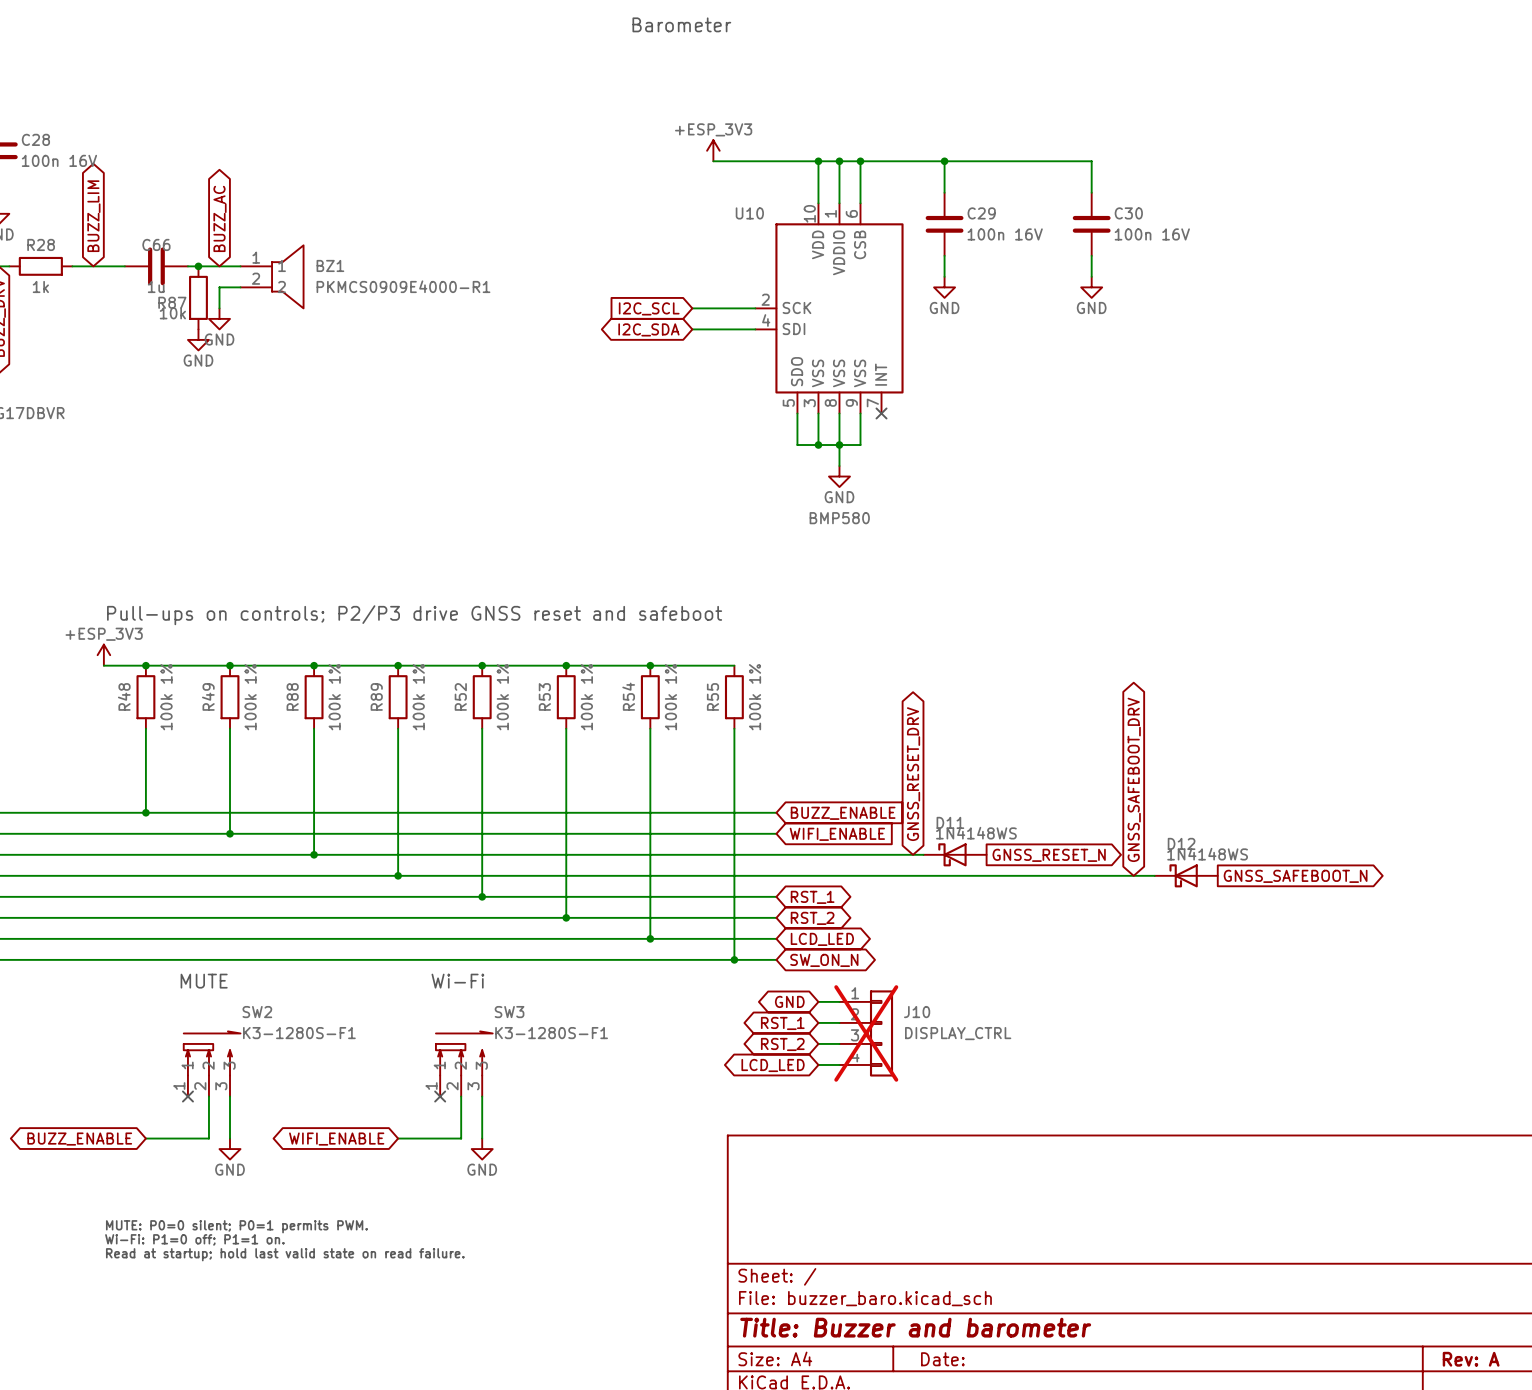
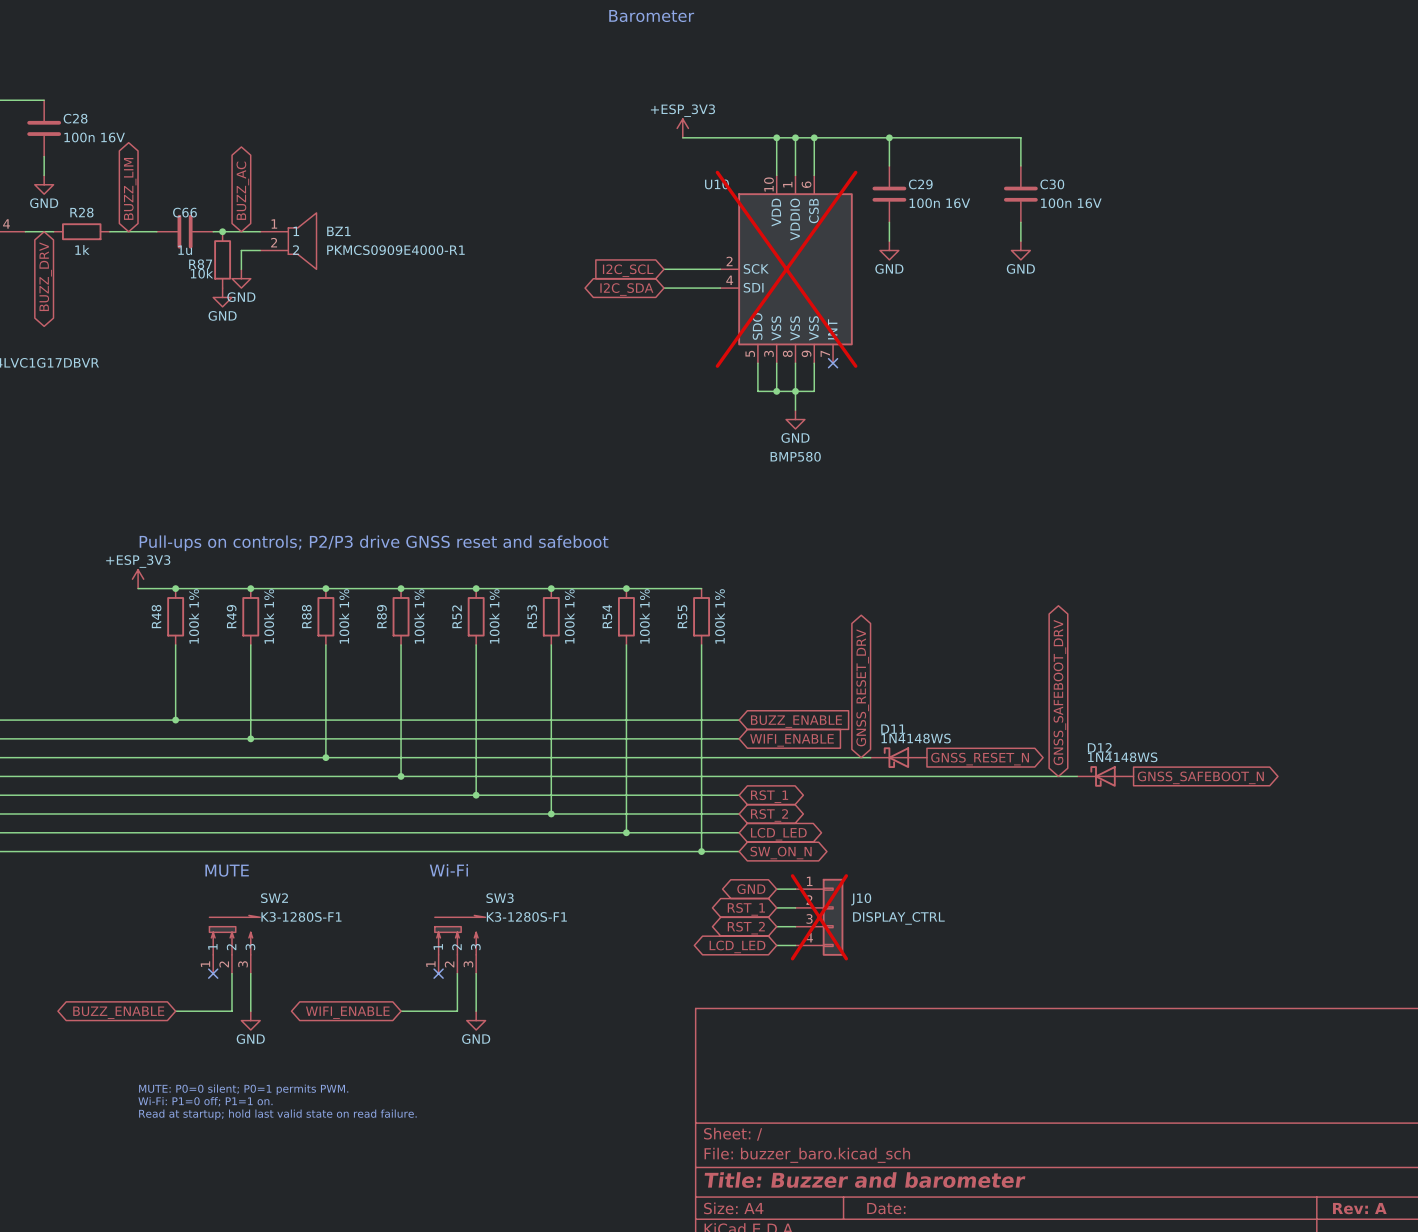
U10 do-not-place cross: none -> (786, 269)

